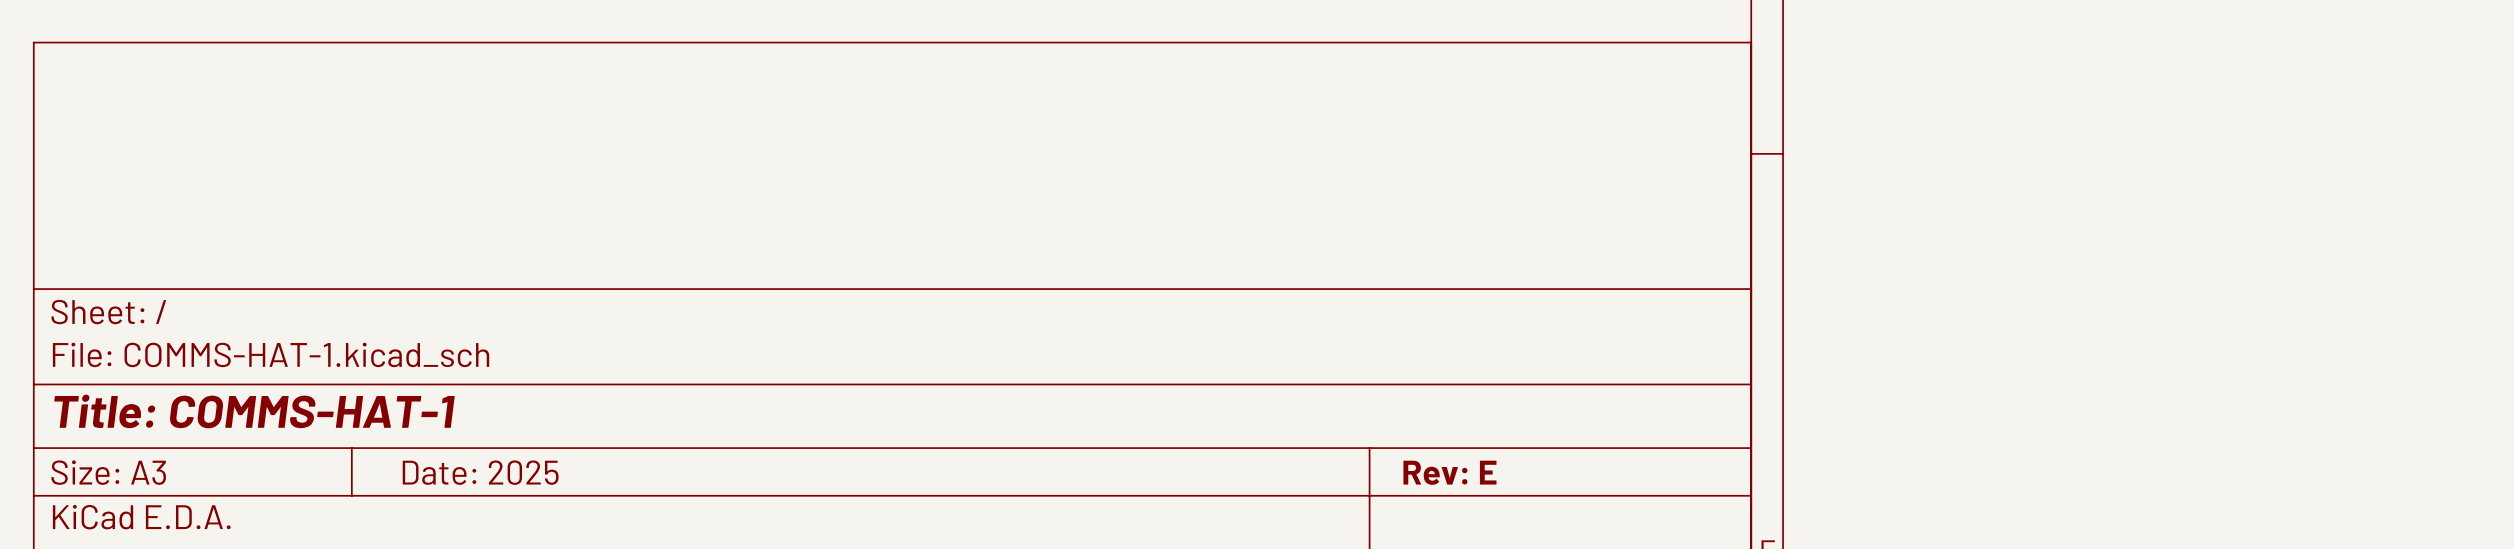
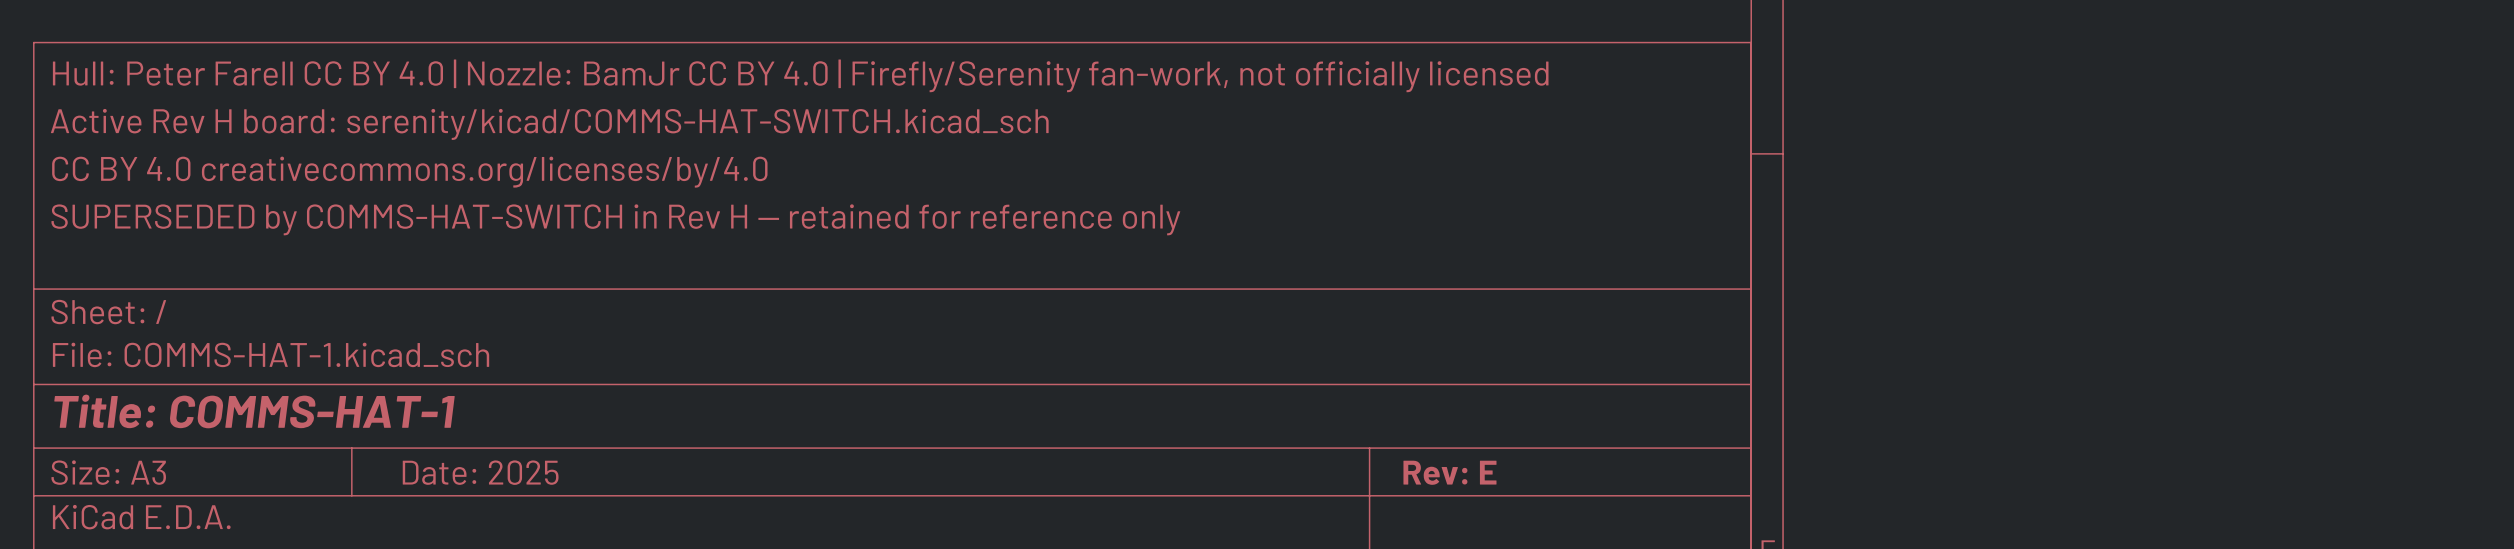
title block: none -> Hull: Peter Farell CC BY 4.0 | Nozzle: BamJr CC BY 4.0 | Firefly/Serenity fan-work, not officially licensed (800, 75)
title block: none -> Active Rev H board: serenity/kicad/COMMS-HAT-SWITCH.kicad_sch (549, 124)
title block: none -> CC BY 4.0 creativecommons.org/licenses/by/4.0 (409, 172)
title block: none -> SUPERSEDED by COMMS-HAT-SWITCH in Rev H — retained for reference only (615, 219)

